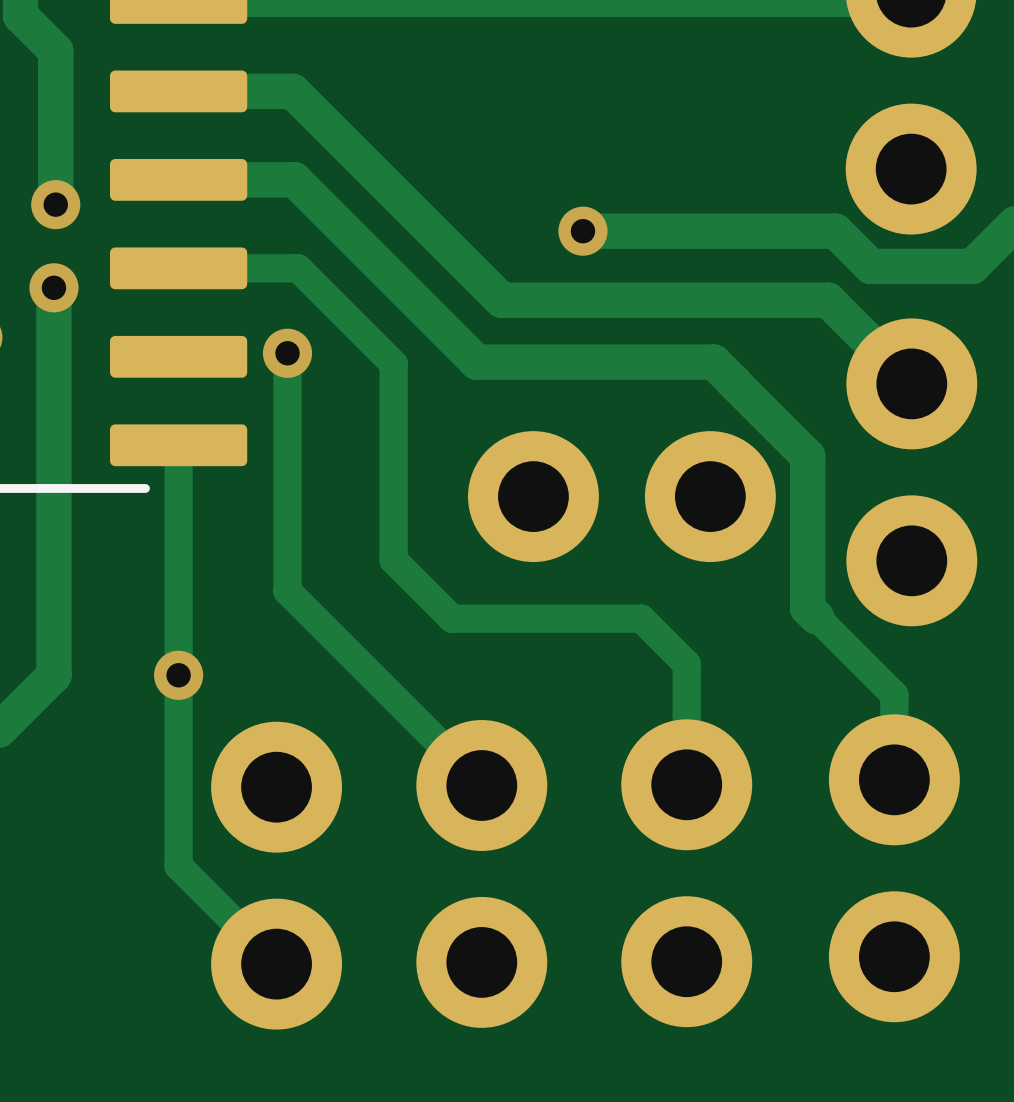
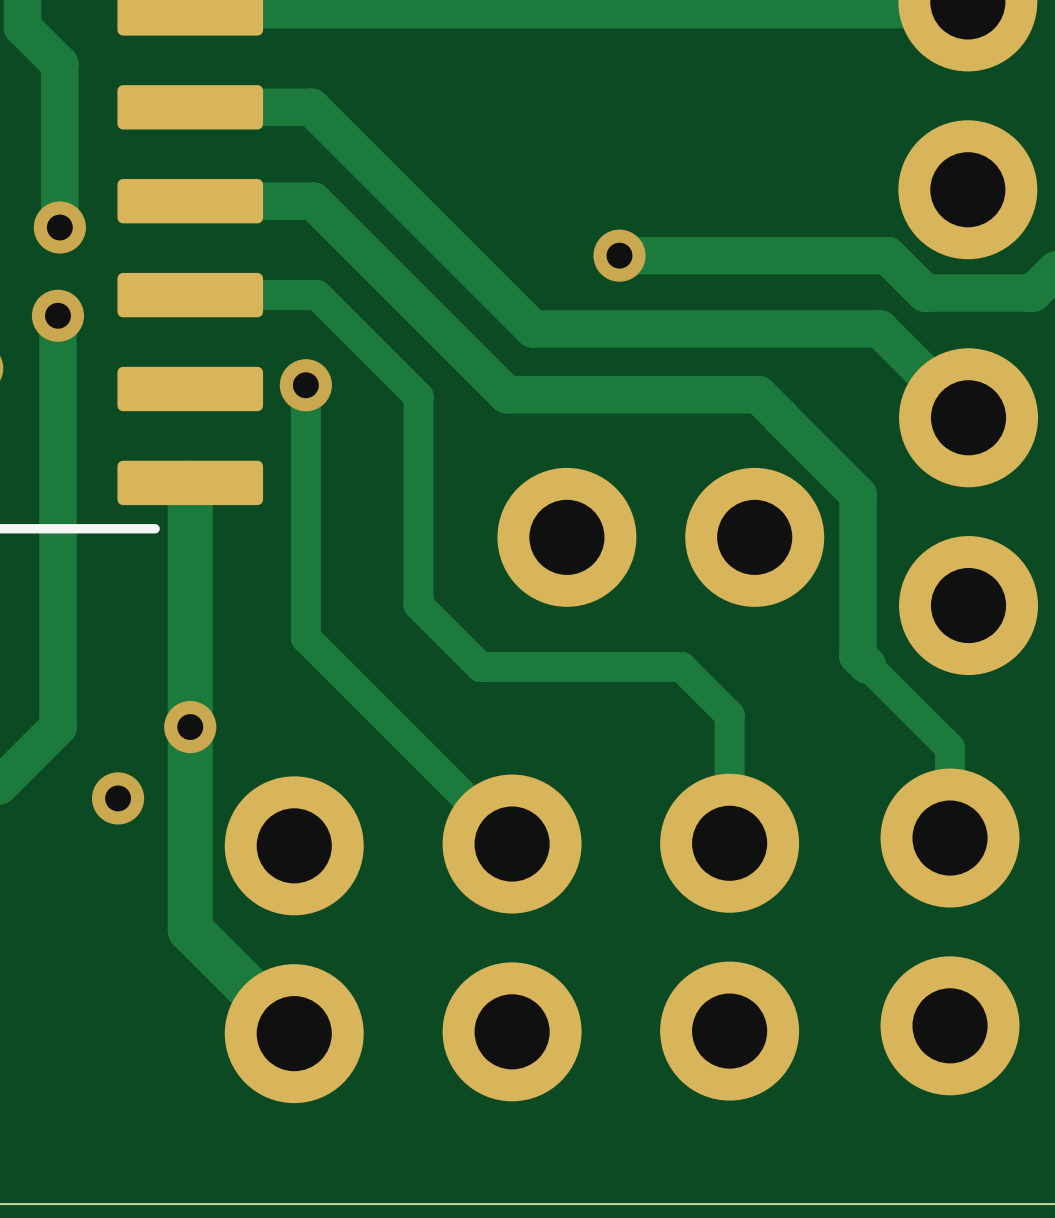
track width: thin (178, 445) (178, 866) (276, 964) -> thick (190, 482) (190, 929) (294, 1033)
via: none -> (118, 798)

